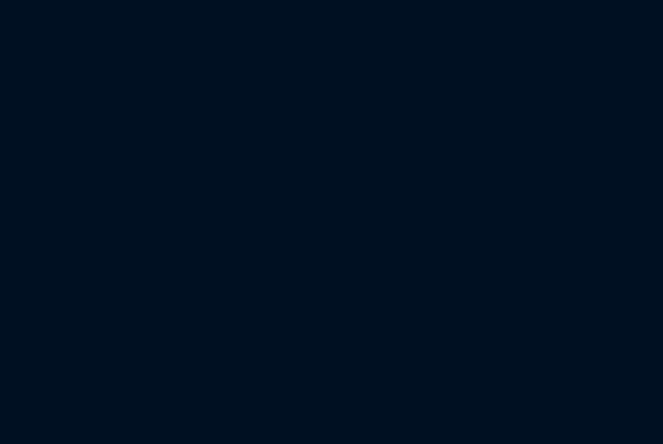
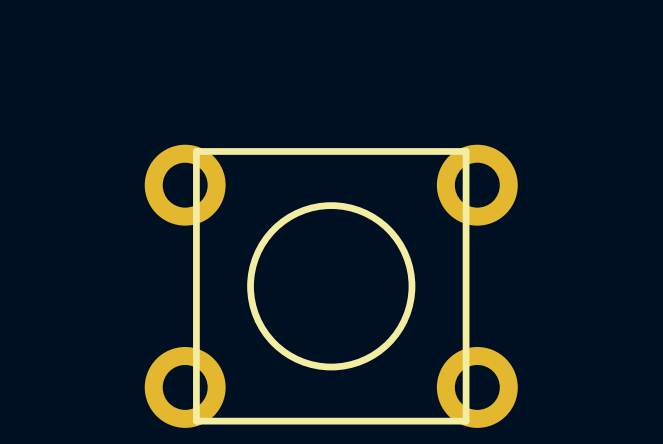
part: none -> (331, 286)

